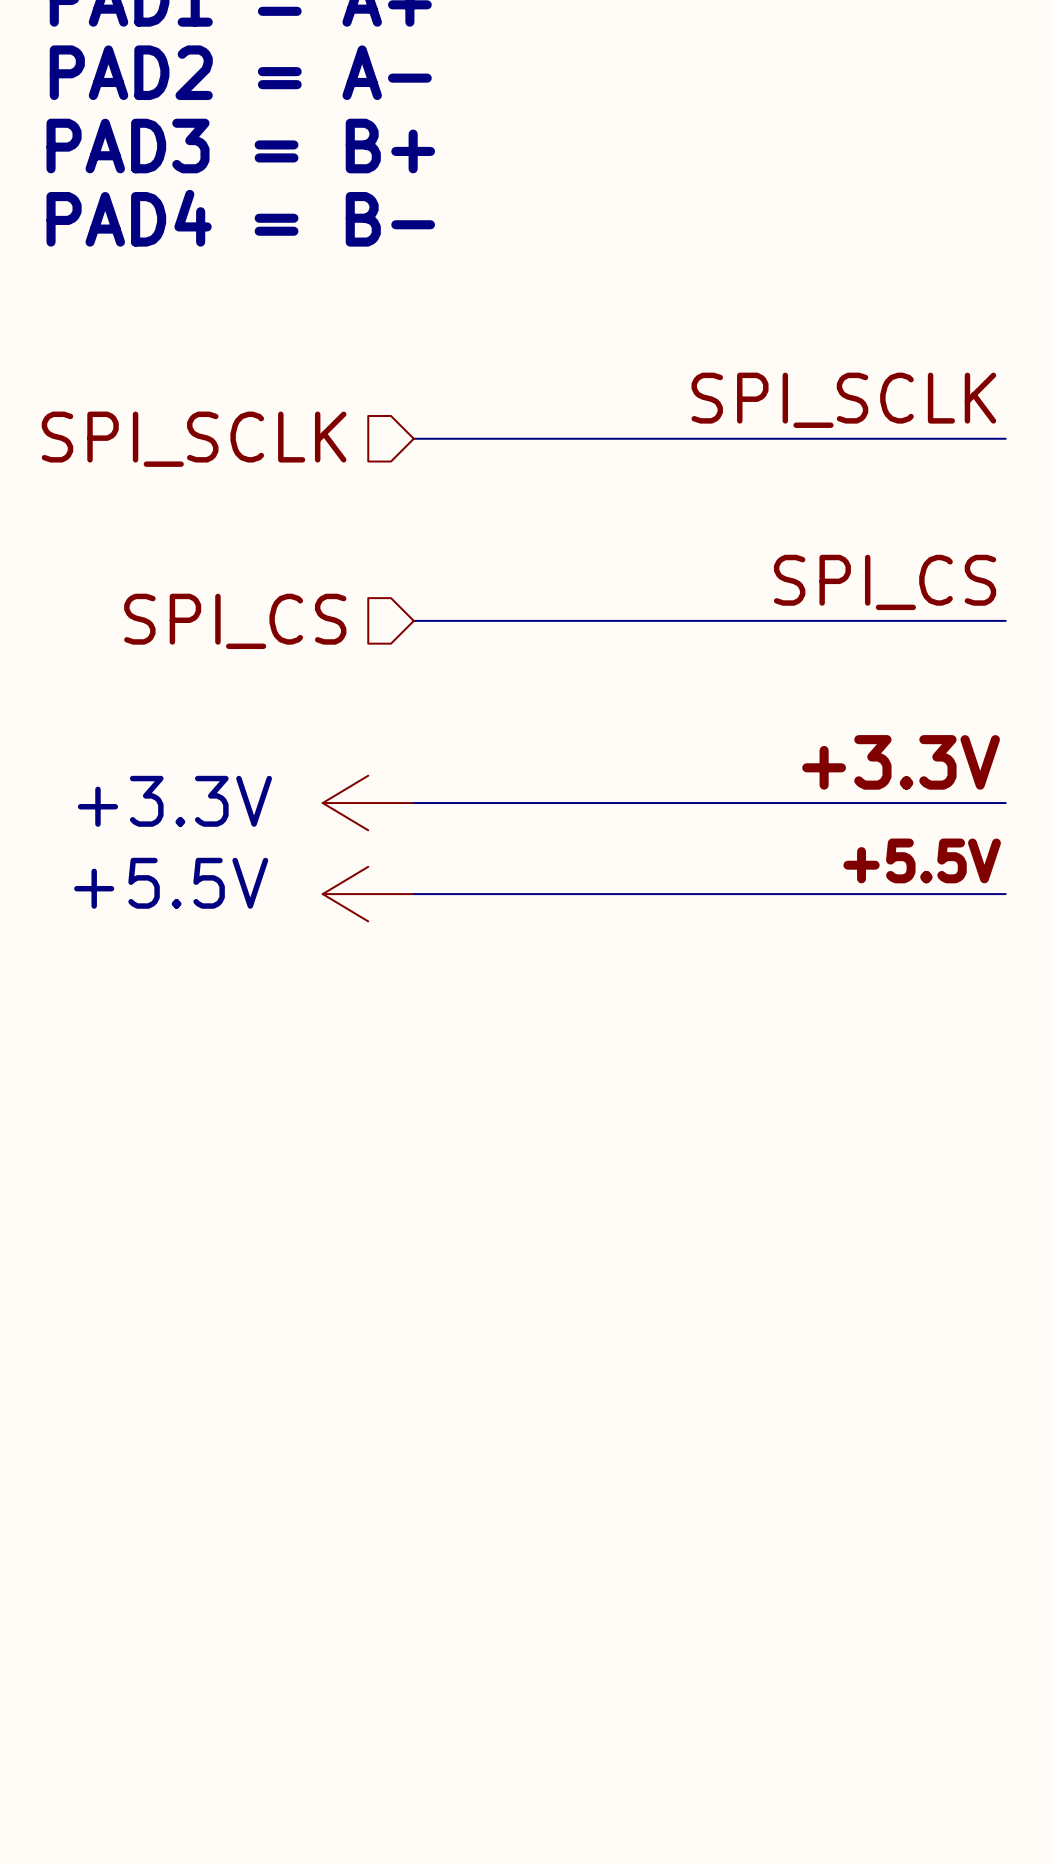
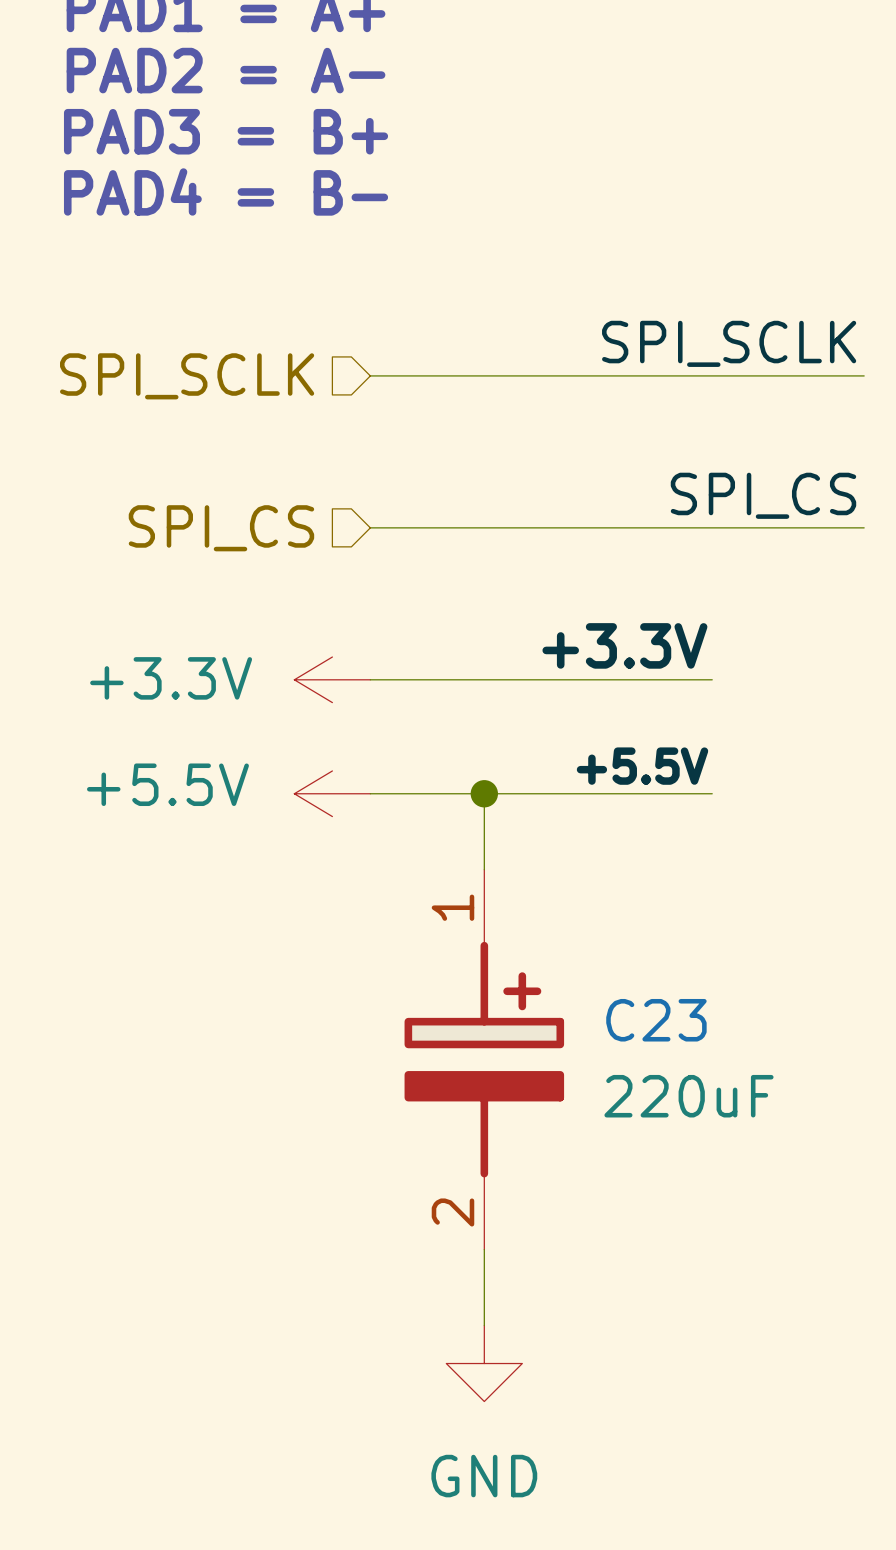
label position: +3.3V (901, 762) -> +3.3V (624, 645)
wire: (823, 803) (1005, 803) -> none
label position: +5.5V (922, 860) -> +5.5V (642, 766)
power symbol position: +5.5V (368, 894) -> +5.5V (332, 793)
wire: (413, 894) (1005, 894) -> none
wire: none -> (370, 793) (712, 793)
wire: none -> (484, 793) (484, 869)
junction: none -> (484, 793)
C23: none -> 220uF (484, 1059)
wire: none -> (484, 1249) (484, 1325)
power symbol: none -> GND (484, 1363)

